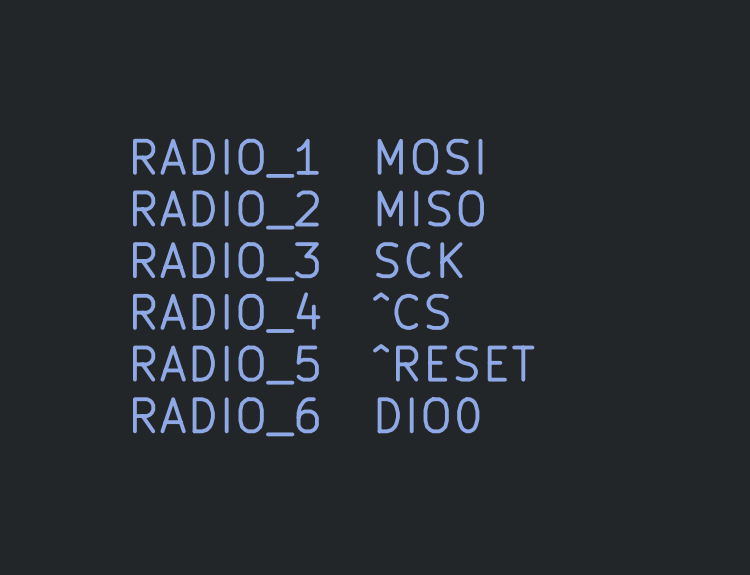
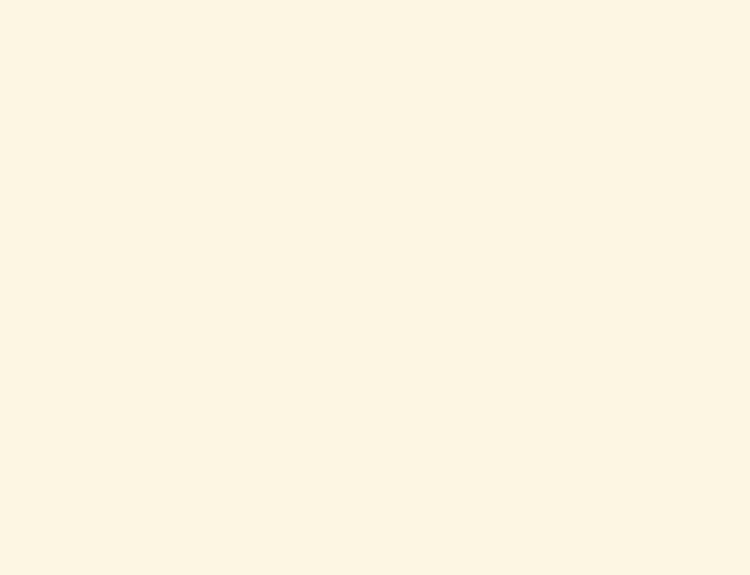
text: RADIO_1 MOSI (307, 158) -> none
text: RADIO_2 MISO (308, 210) -> none
text: RADIO_3 SCK (297, 261) -> none
text: RADIO_4 ^CS (290, 312) -> none
text: RADIO_5 ^RESET (333, 364) -> none
text: RADIO_6 DIO0 (306, 416) -> none

